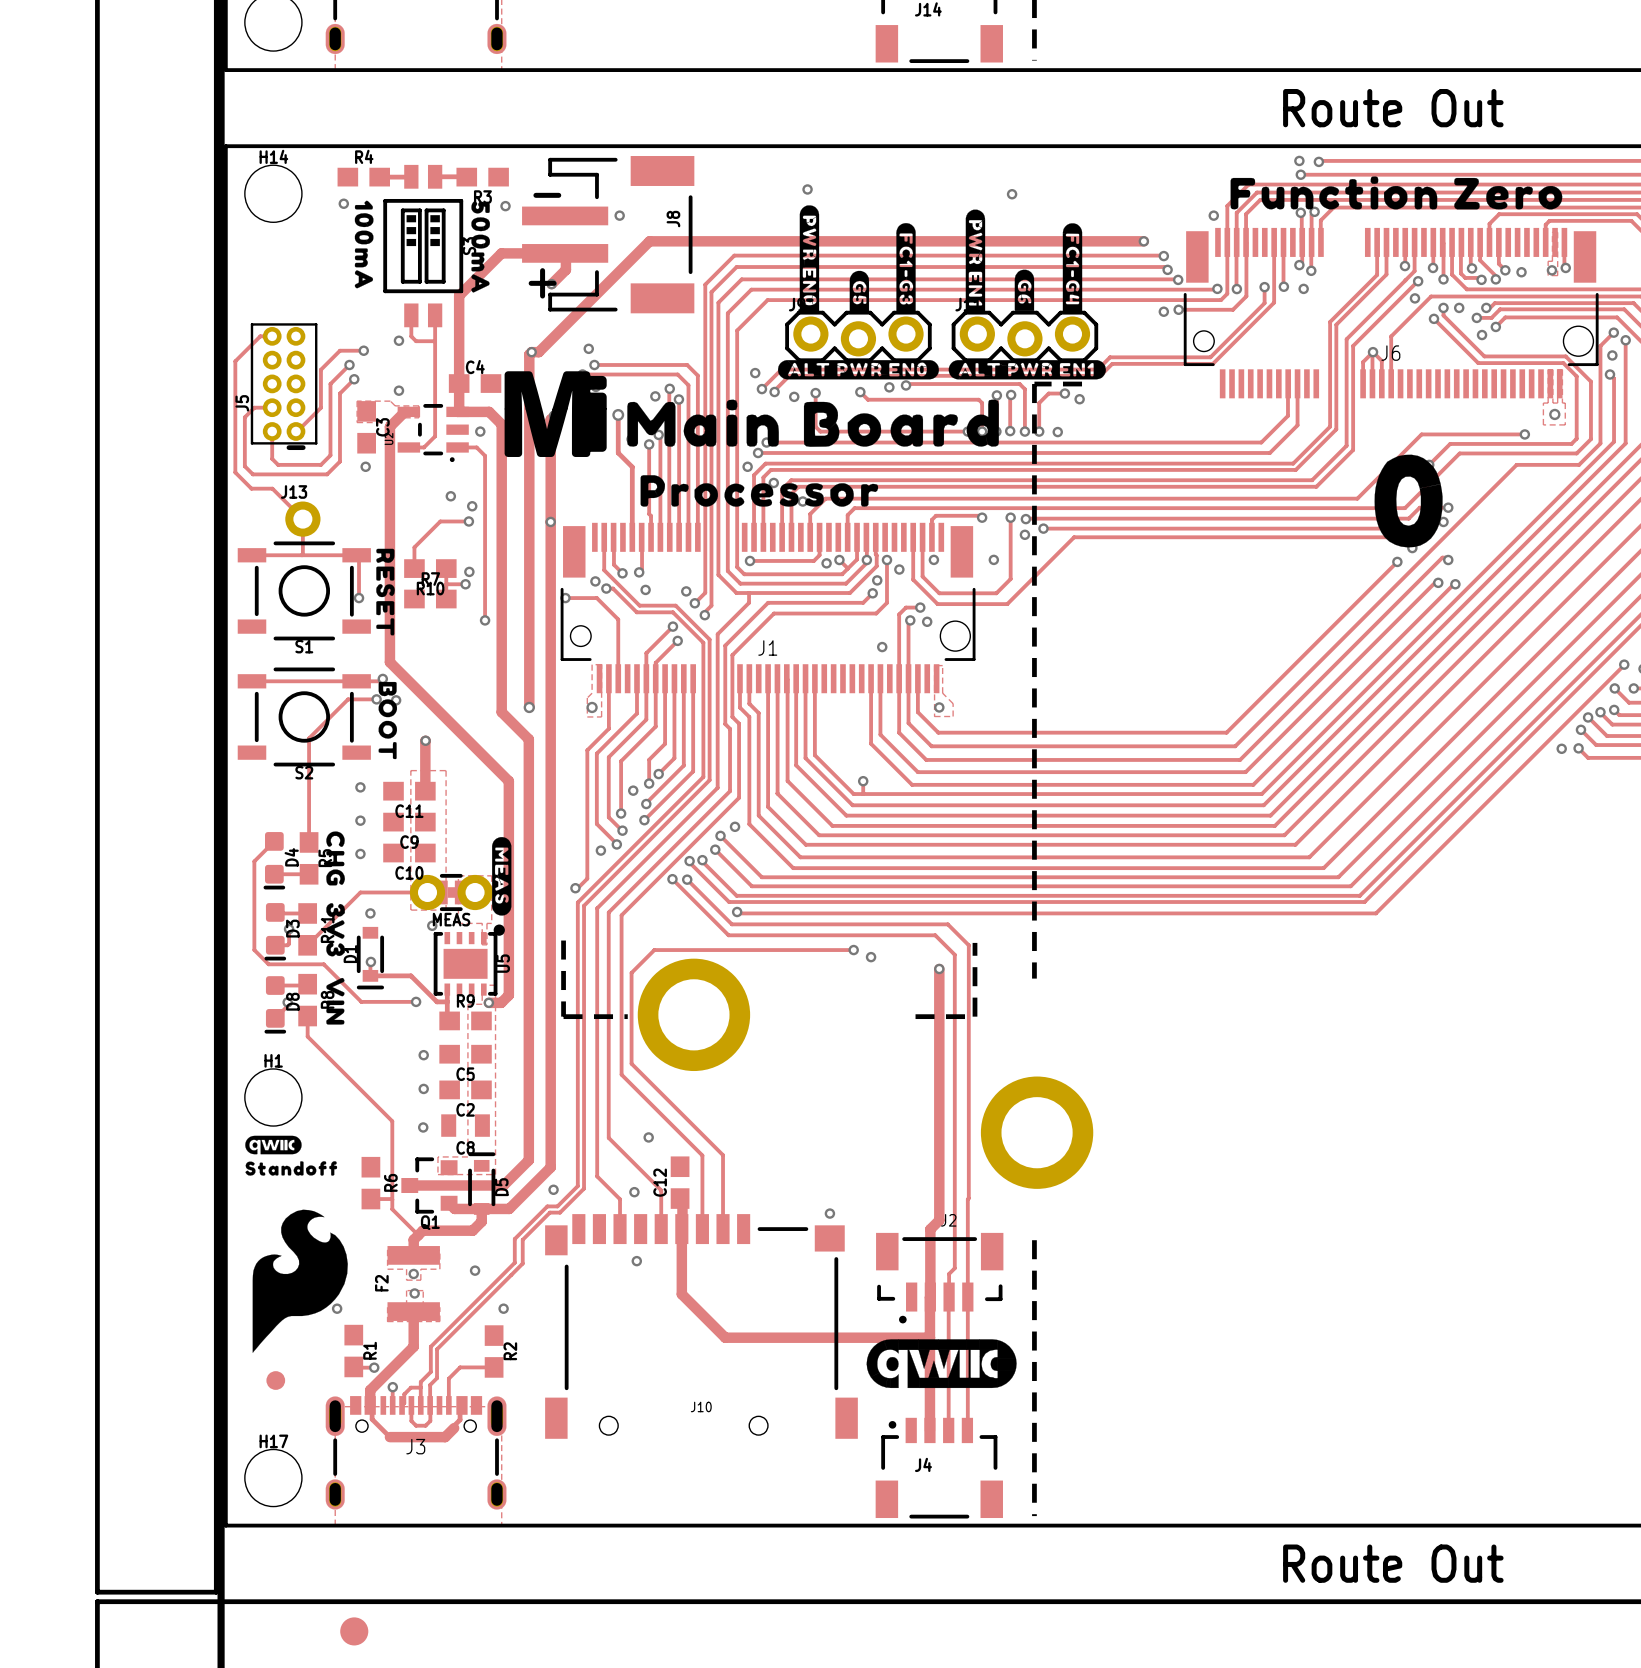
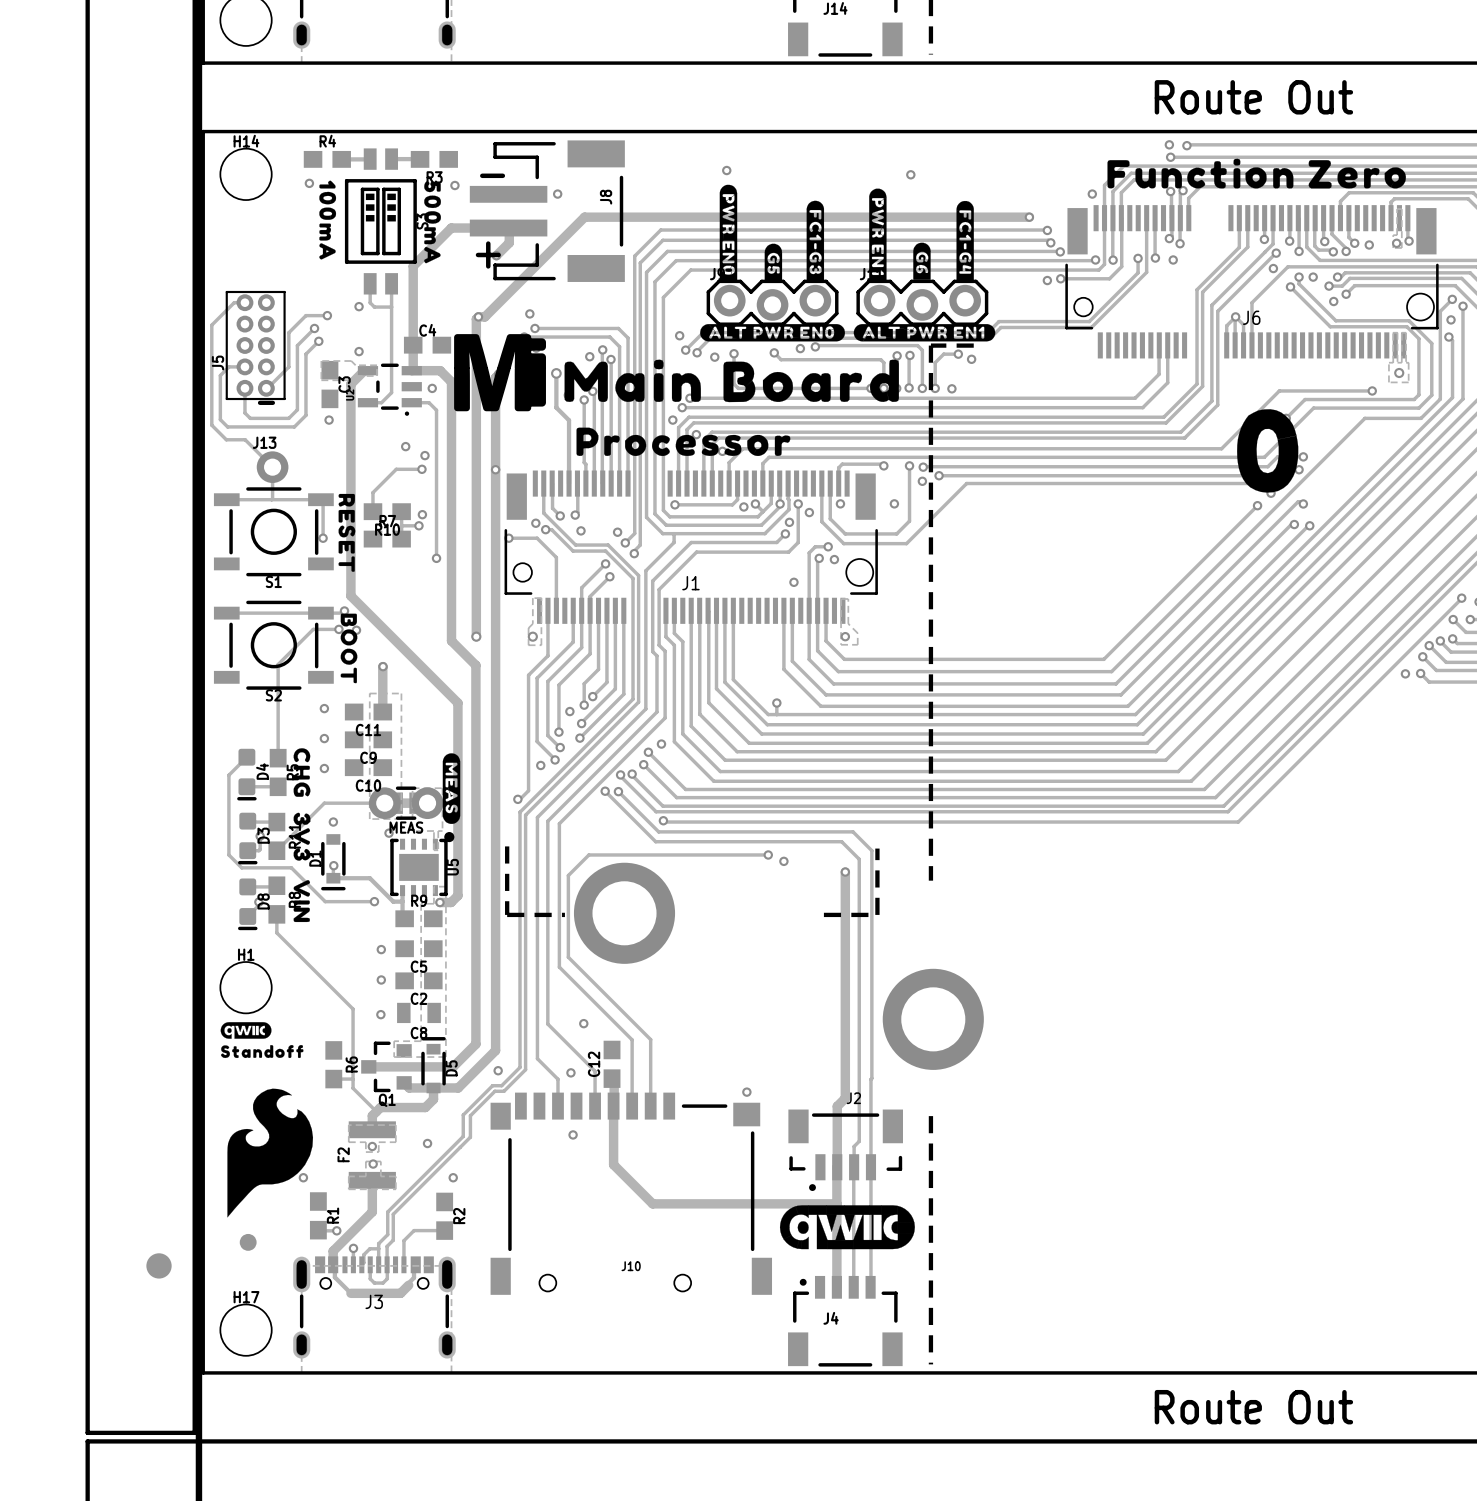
part position: (354, 1631) -> (159, 1265)

